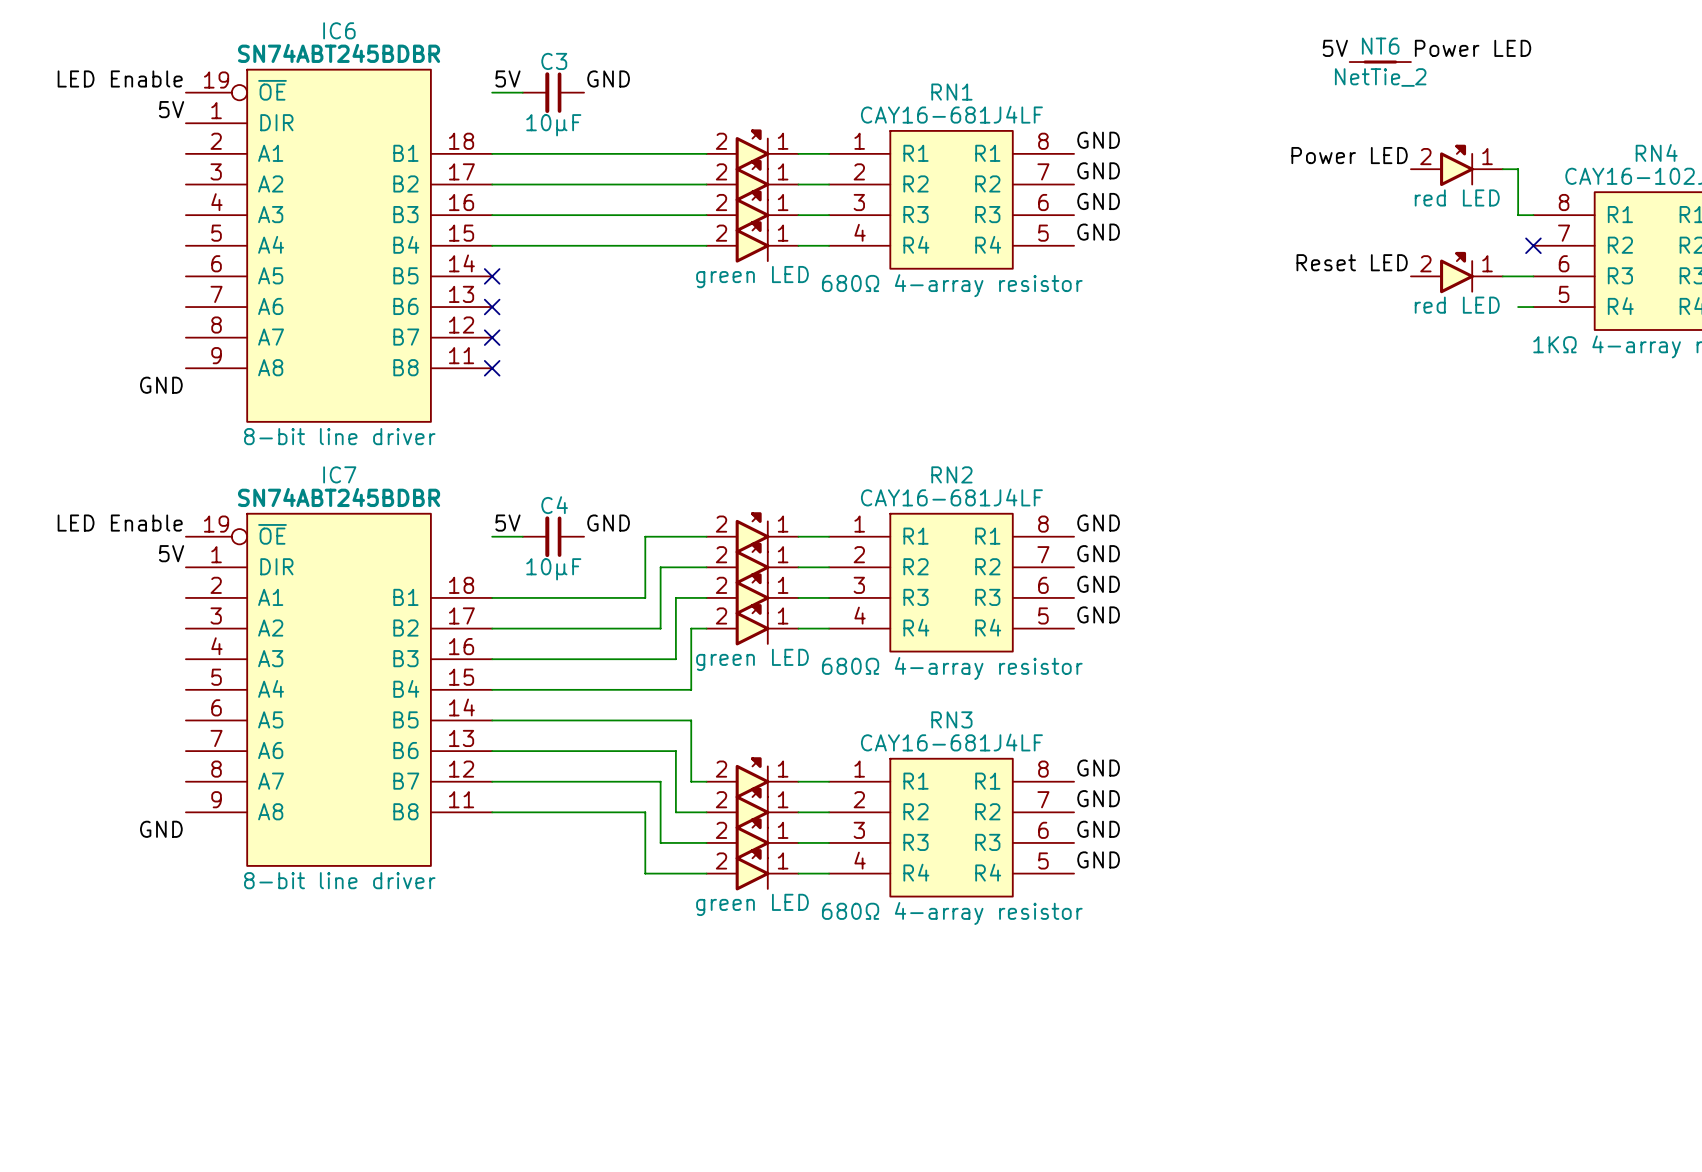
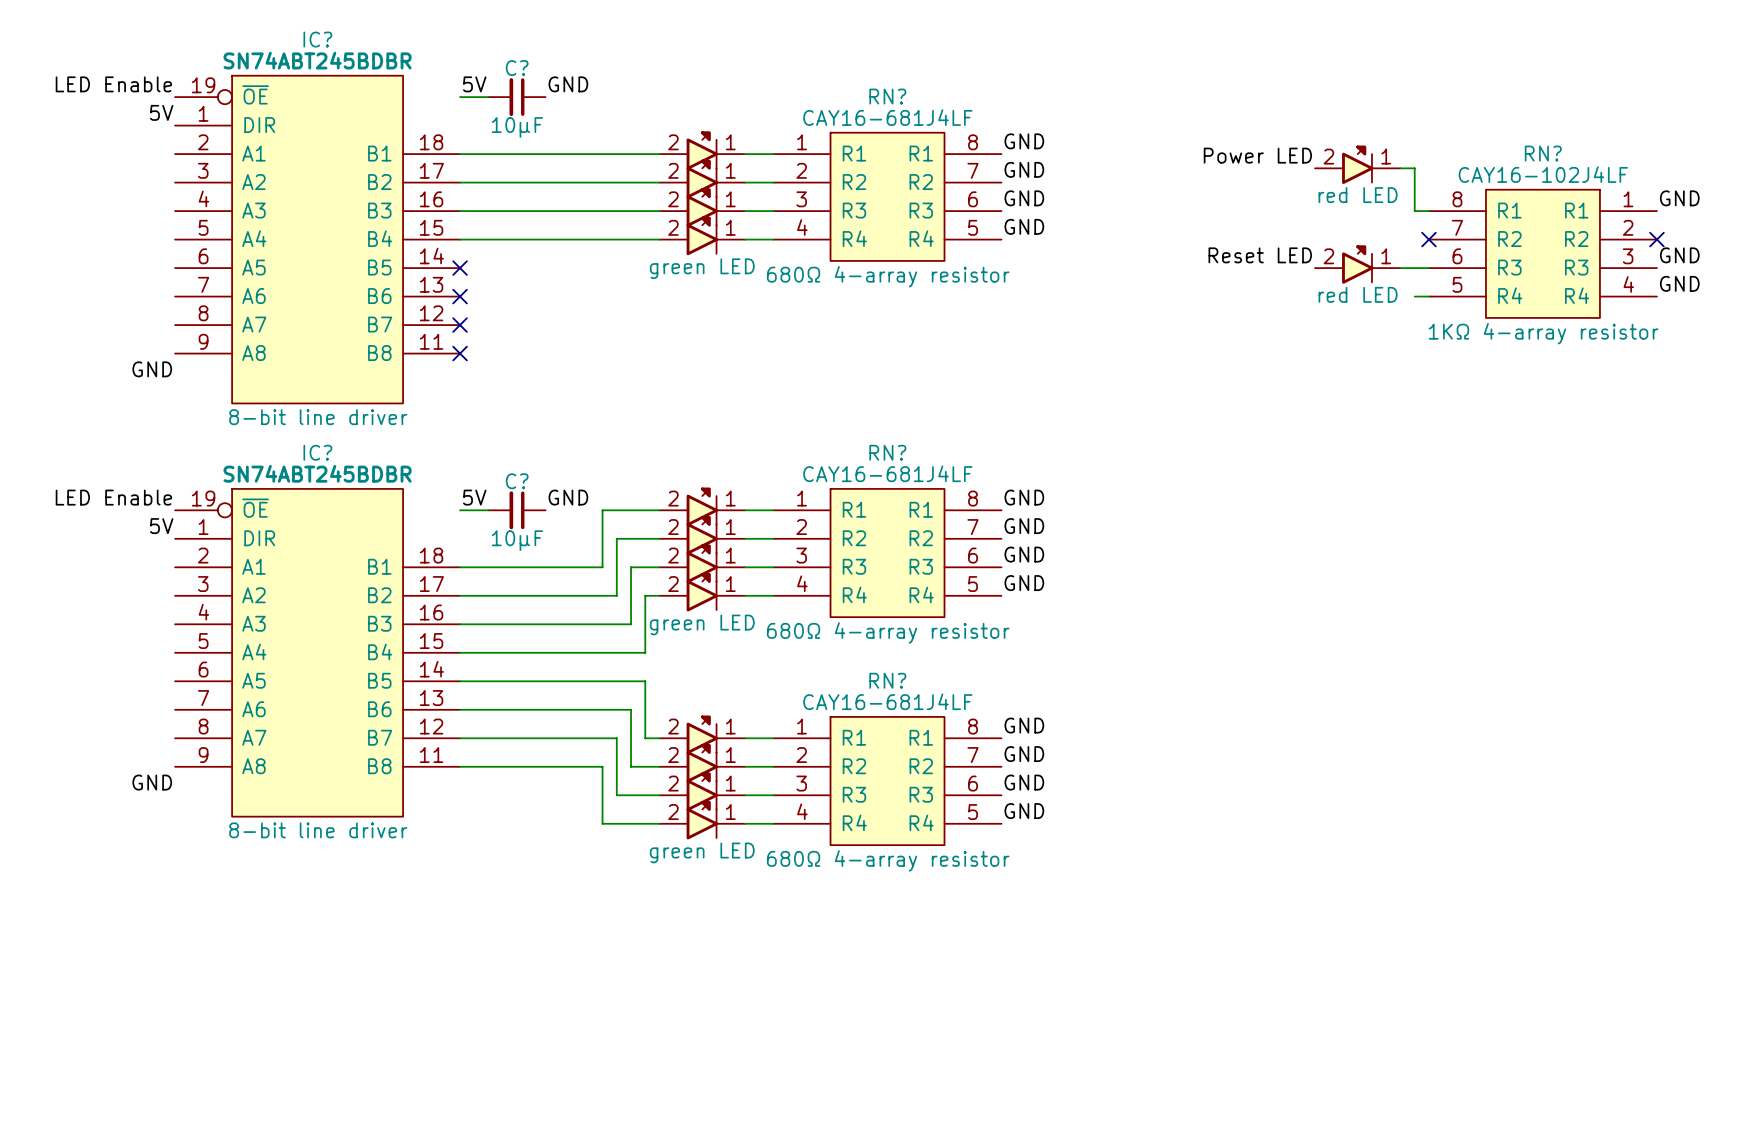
IC6 name: IC6 (339, 30) -> IC? (317, 39)
label: 5V (1335, 48) -> none
label: Power LED (1473, 48) -> none
C3 name: C3 (554, 61) -> C? (517, 68)
NT6: NetTie_2 (1380, 62) -> none
RN1 name: RN1 (951, 92) -> RN? (887, 96)
RN4 name: RN4 (1656, 152) -> RN? (1543, 153)
IC7 name: IC7 (339, 474) -> IC? (317, 452)
RN2 name: RN2 (951, 474) -> RN? (887, 452)
C4 name: C4 (554, 505) -> C? (517, 481)
RN3 name: RN3 (951, 719) -> RN? (887, 680)

